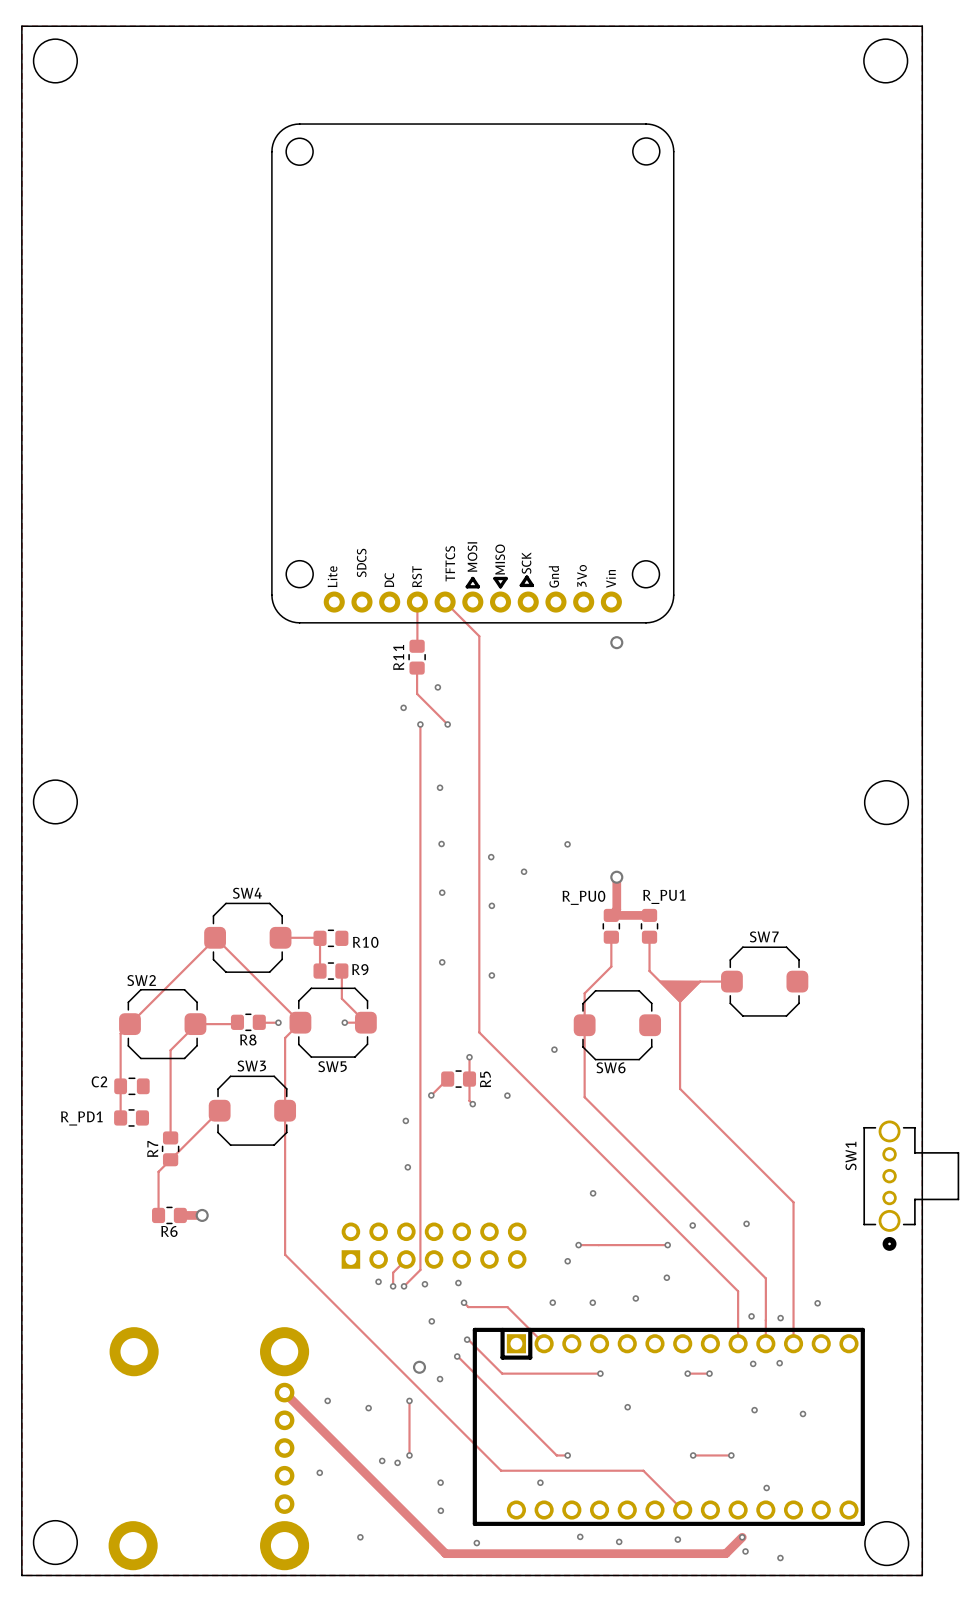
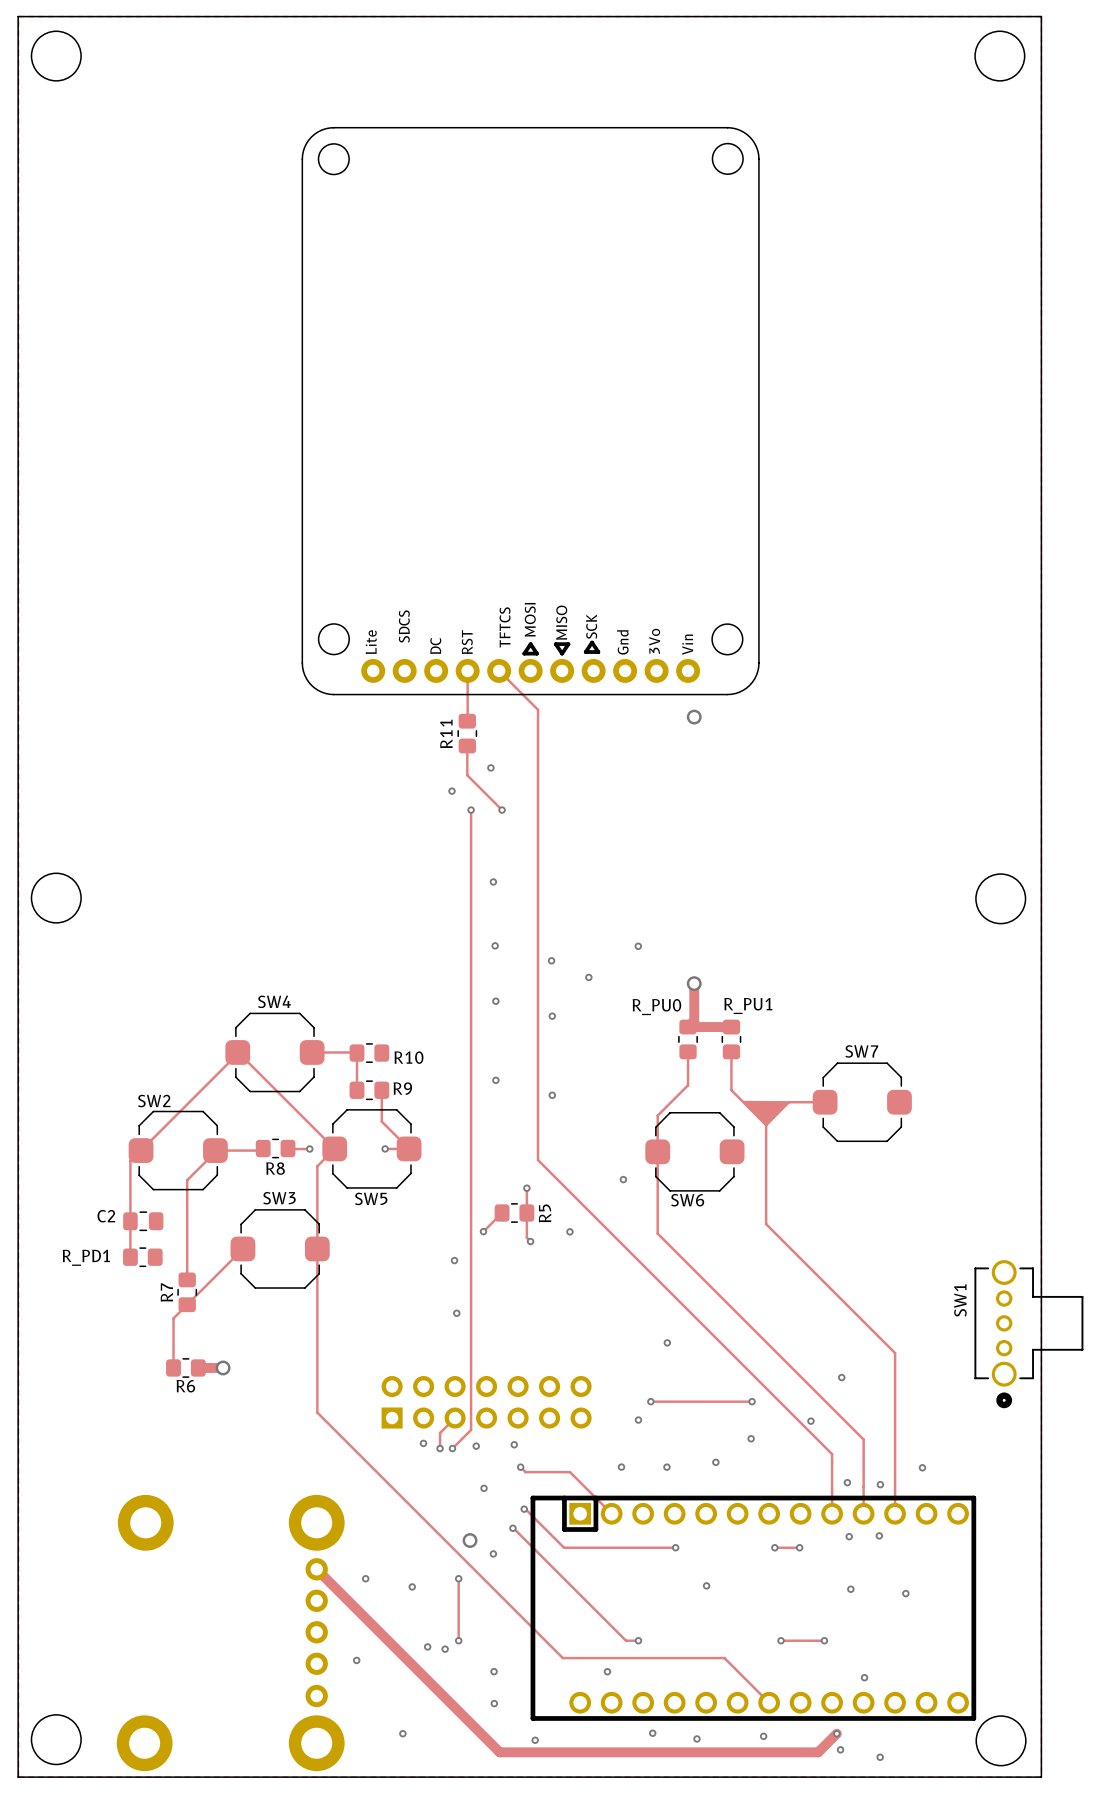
via position: (692, 1225) -> (810, 1421)

